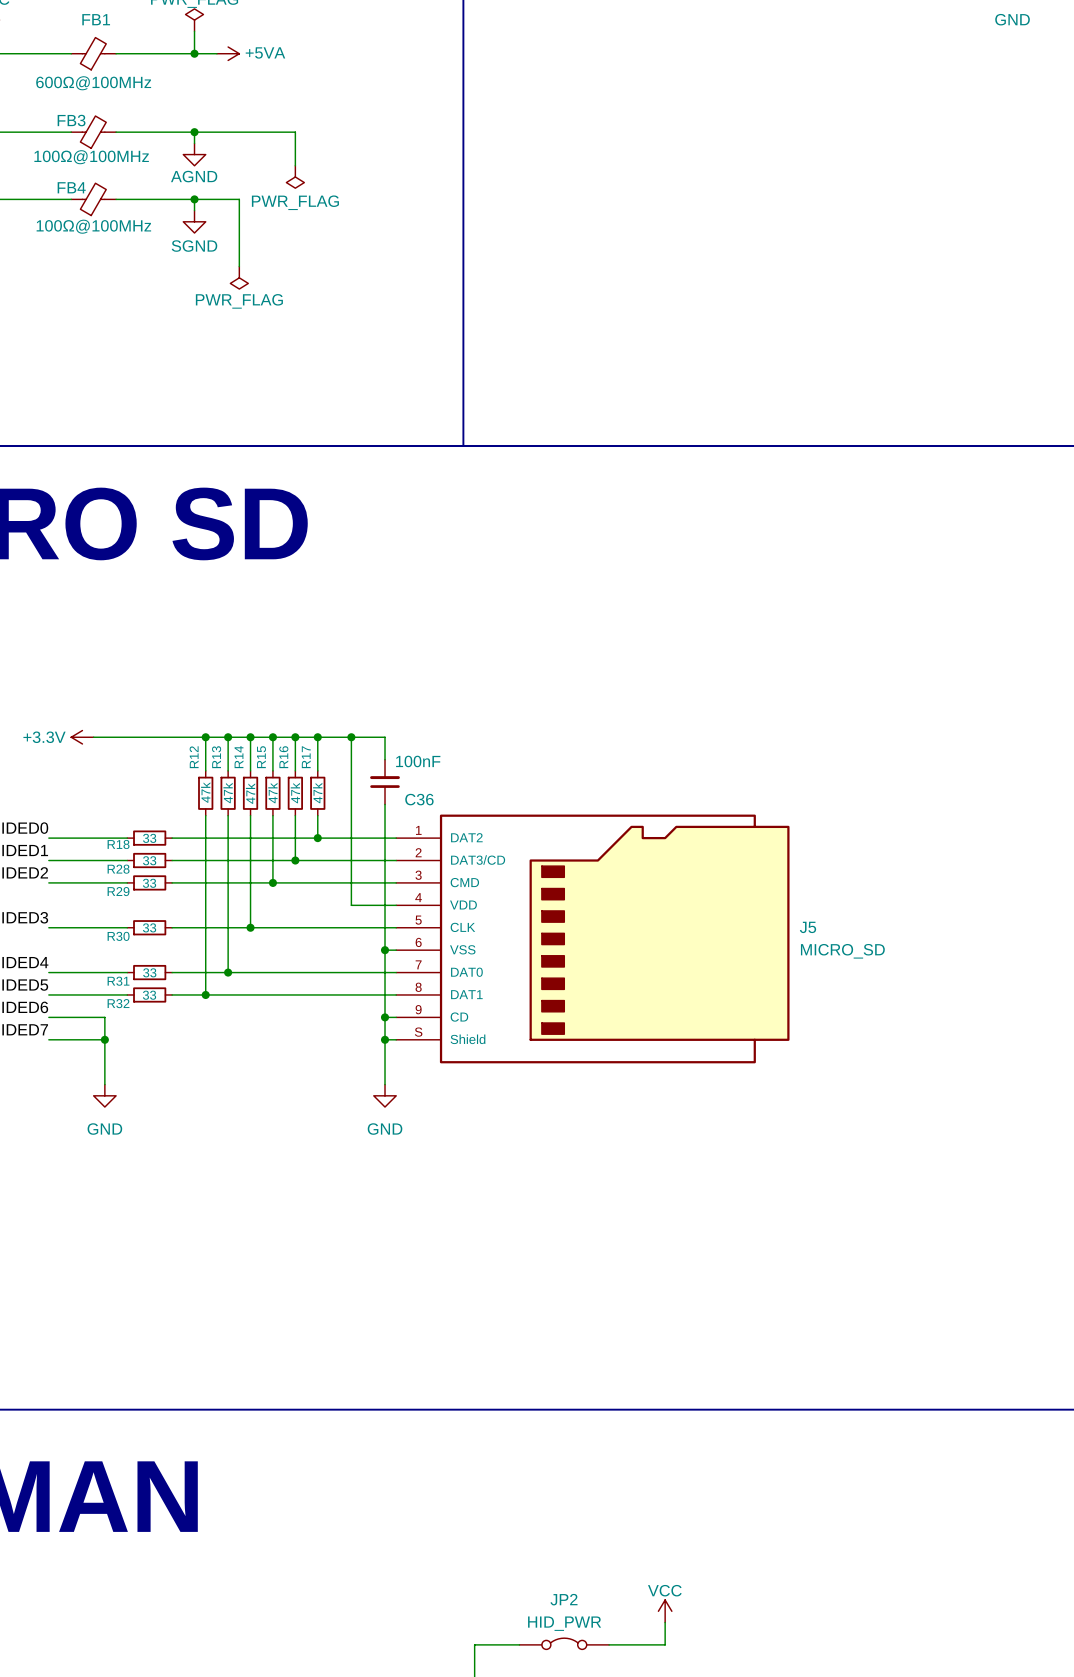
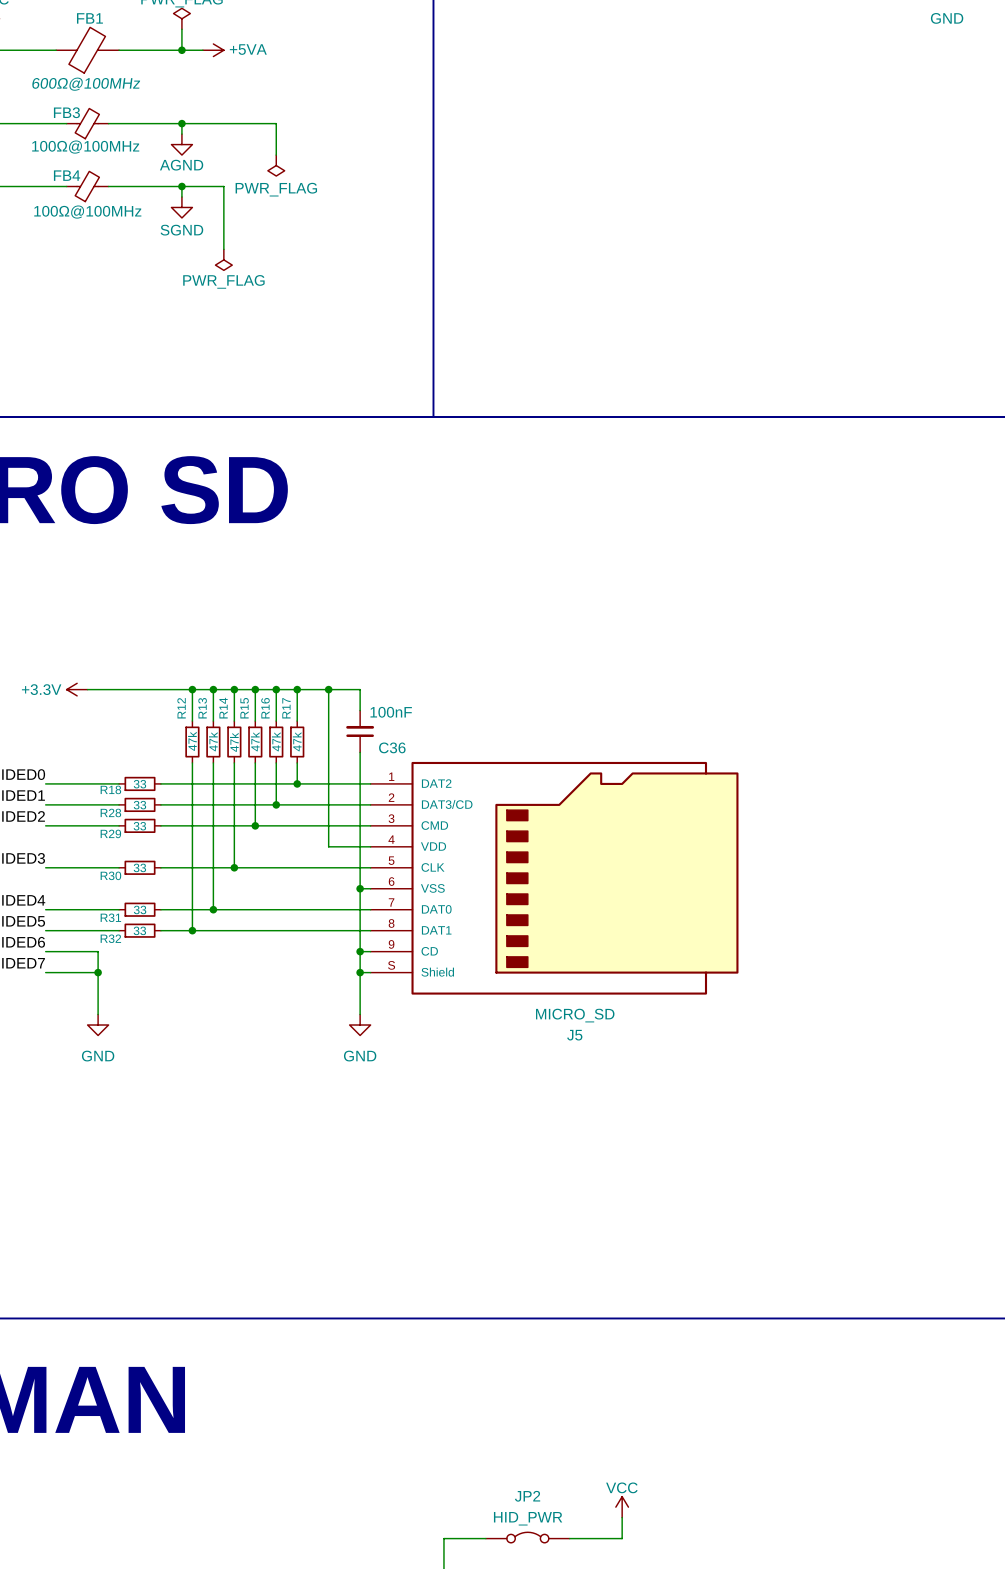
FB1 symbol: [71, 37, 117, 70] -> [56, 27, 120, 74]
FB1 value: 600Ω@100MHz (93, 83) -> none
FB1 text: none -> 600Ω@100MHz (86, 84)
J5 name position: J5 (807, 927) -> J5 (574, 1035)
J5 value position: MICRO_SD (842, 951) -> MICRO_SD (575, 1015)

